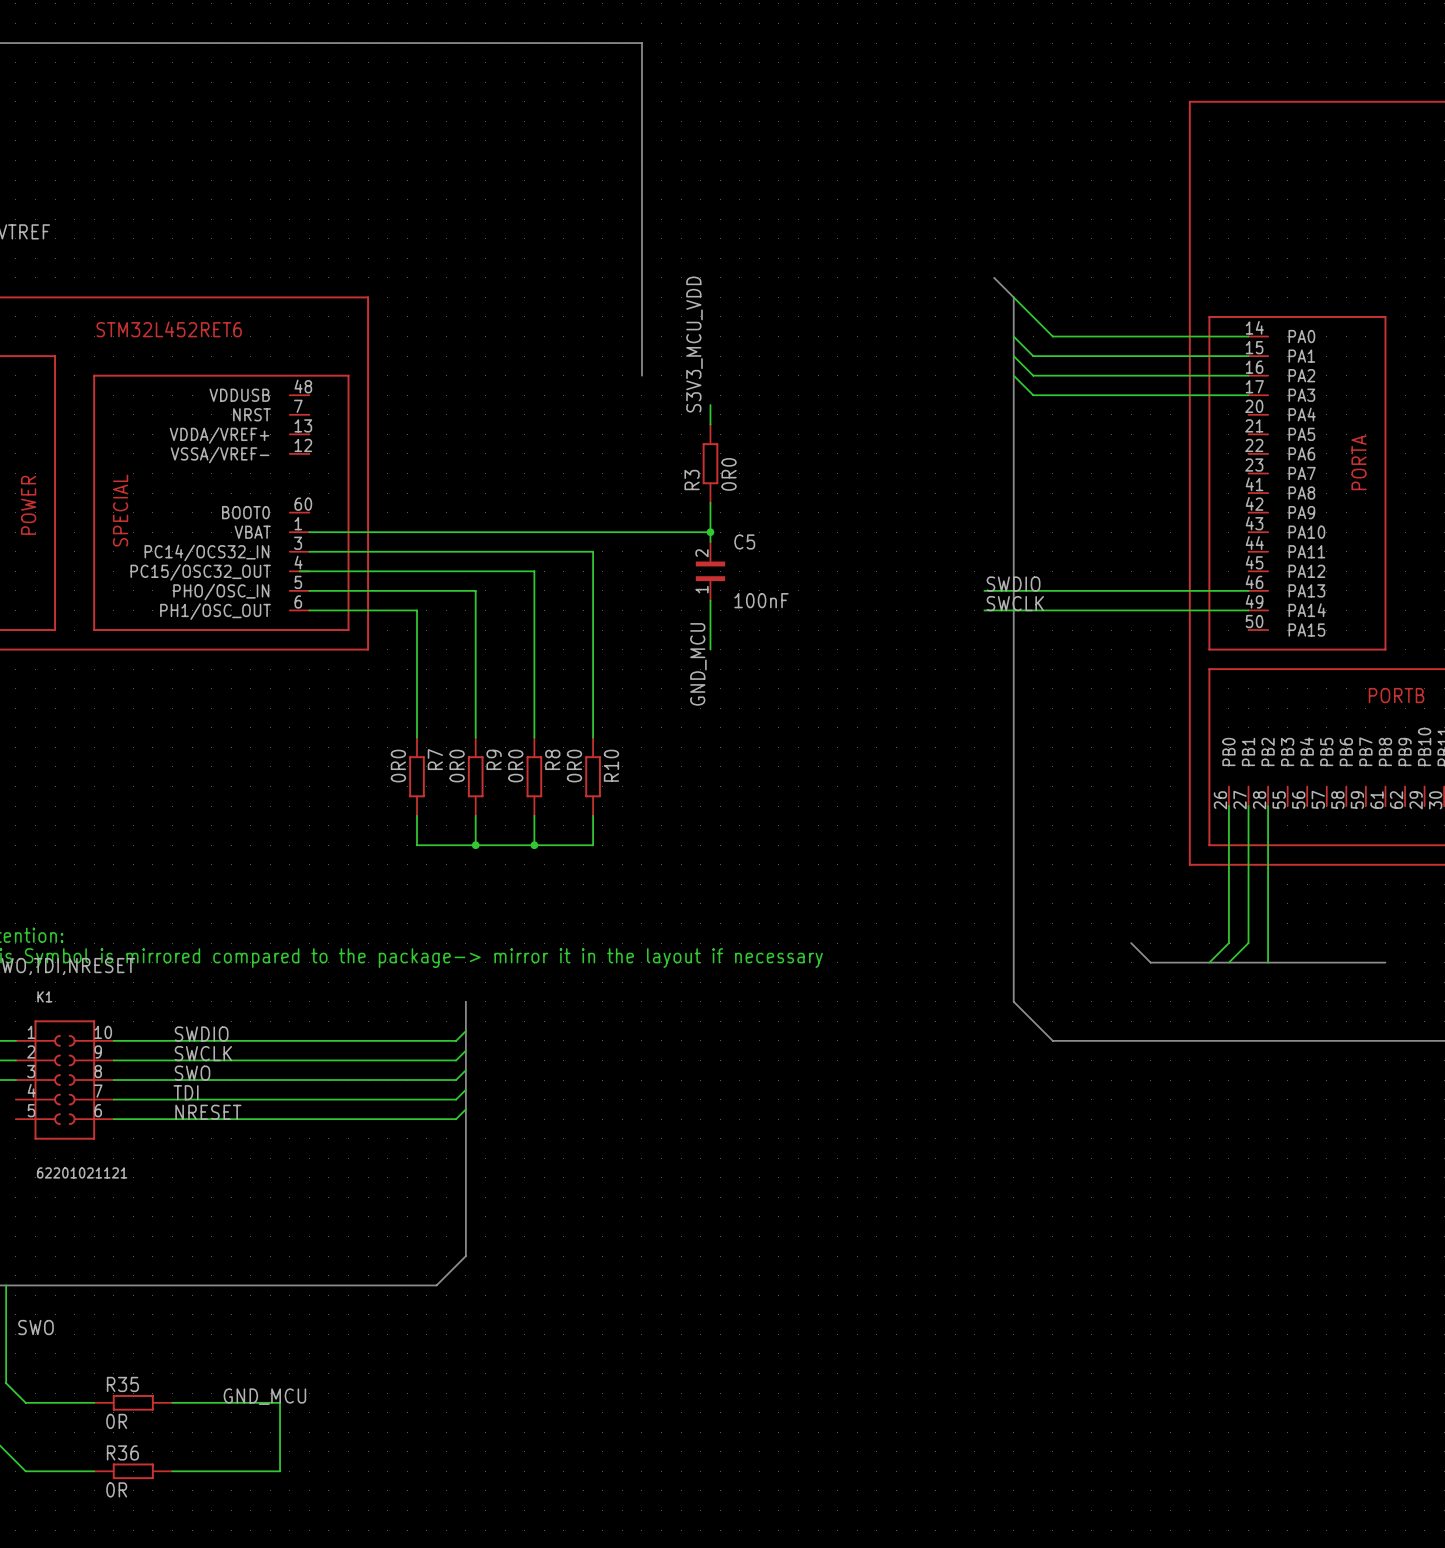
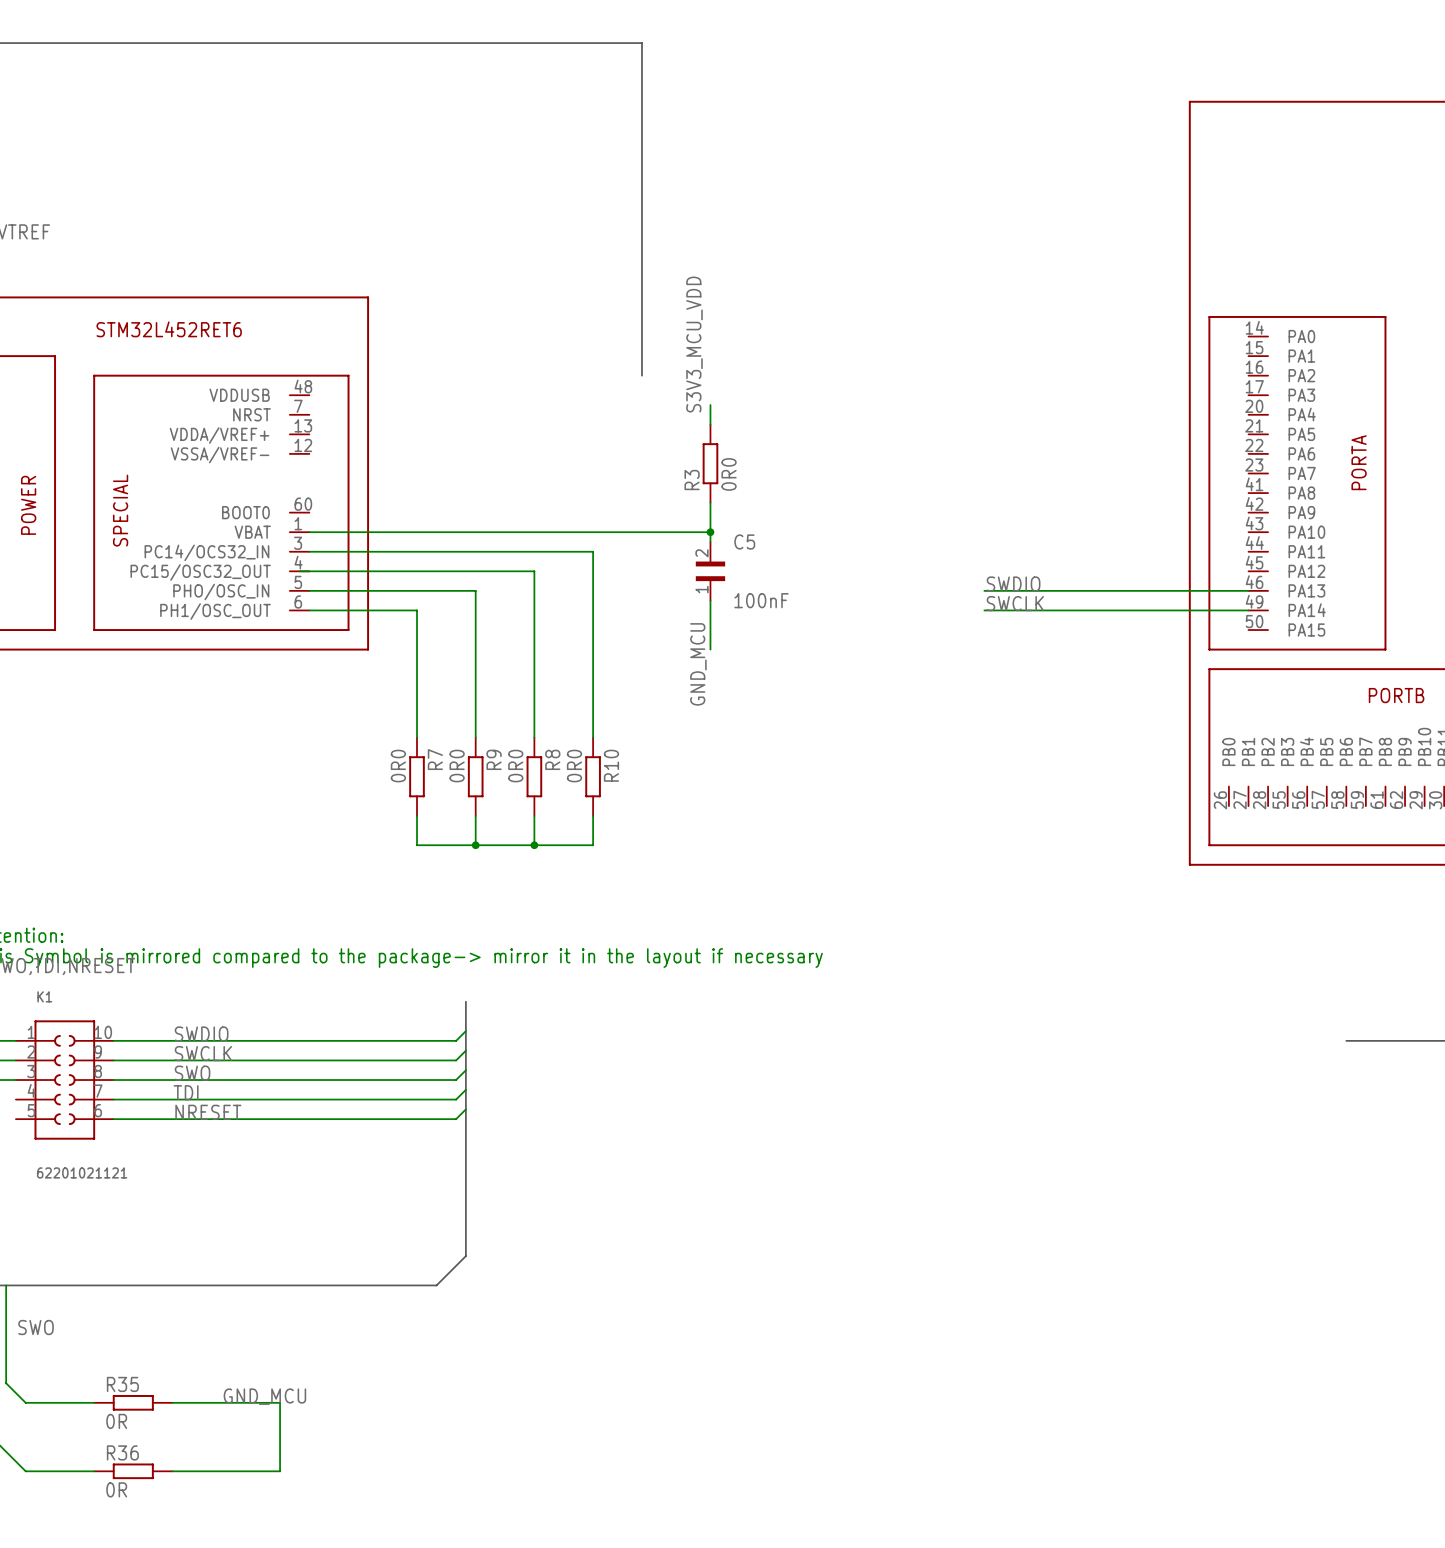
bus: (994, 277) (1013, 297) (1013, 1001) (1052, 1040) (1346, 1040) -> none
wire: (1013, 297) (1052, 336) (1248, 336) -> none
wire: (1013, 336) (1033, 356) (1248, 356) -> none
wire: (1013, 356) (1033, 375) (1248, 375) -> none
wire: (1013, 375) (1033, 395) (1248, 395) -> none
wire: (1228, 806) (1228, 943) (1209, 962) -> none
wire: (1248, 806) (1248, 943) (1228, 962) -> none
wire: (1268, 806) (1268, 962) -> none
bus: (1131, 943) (1150, 962) (1385, 962) -> none

